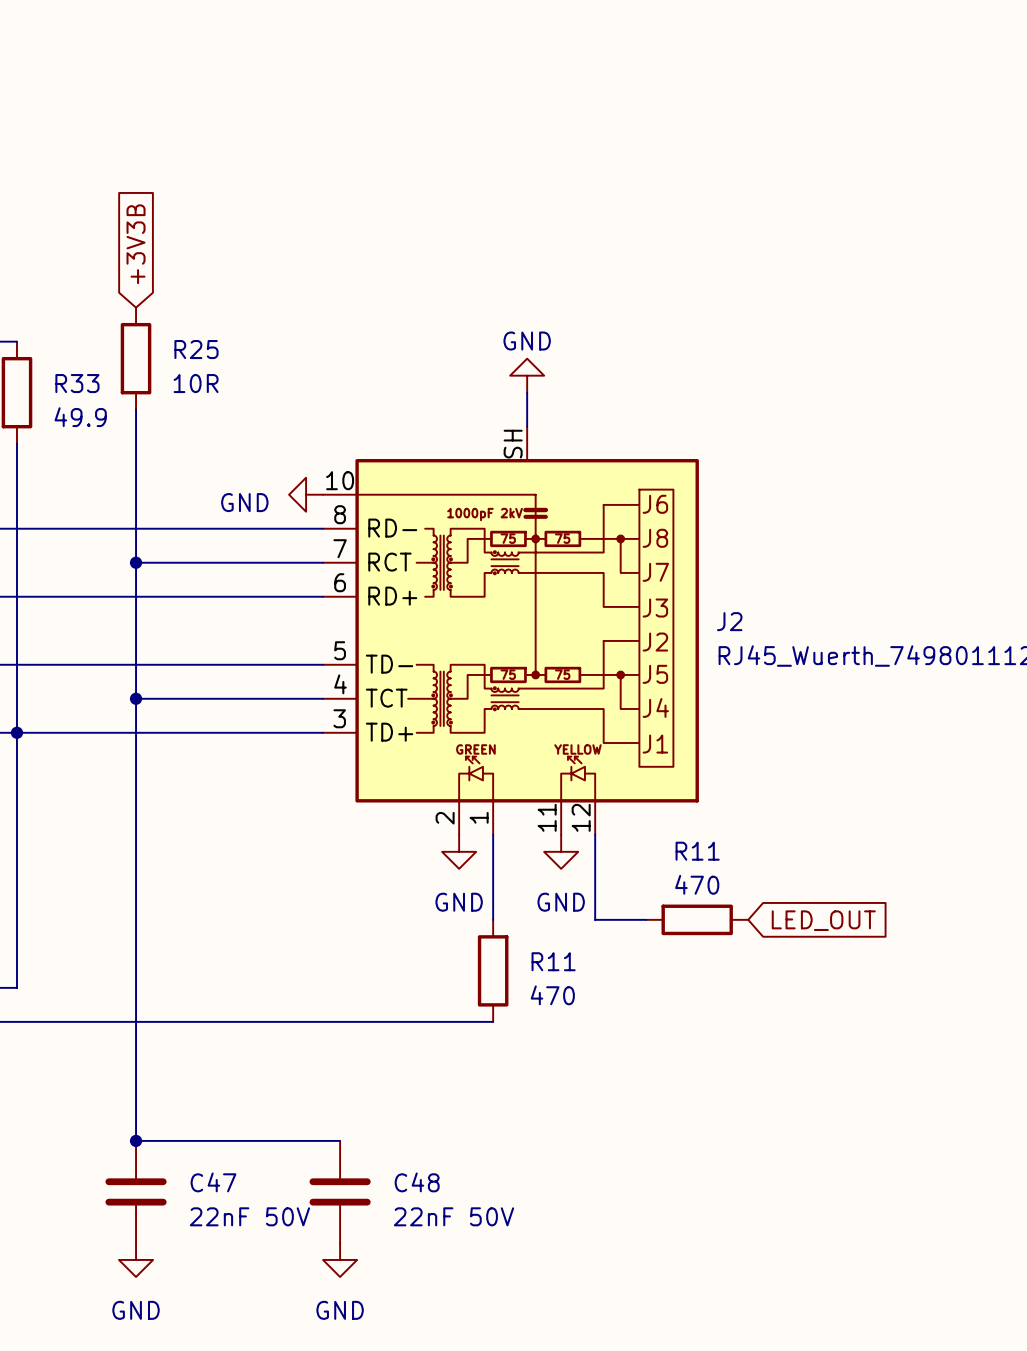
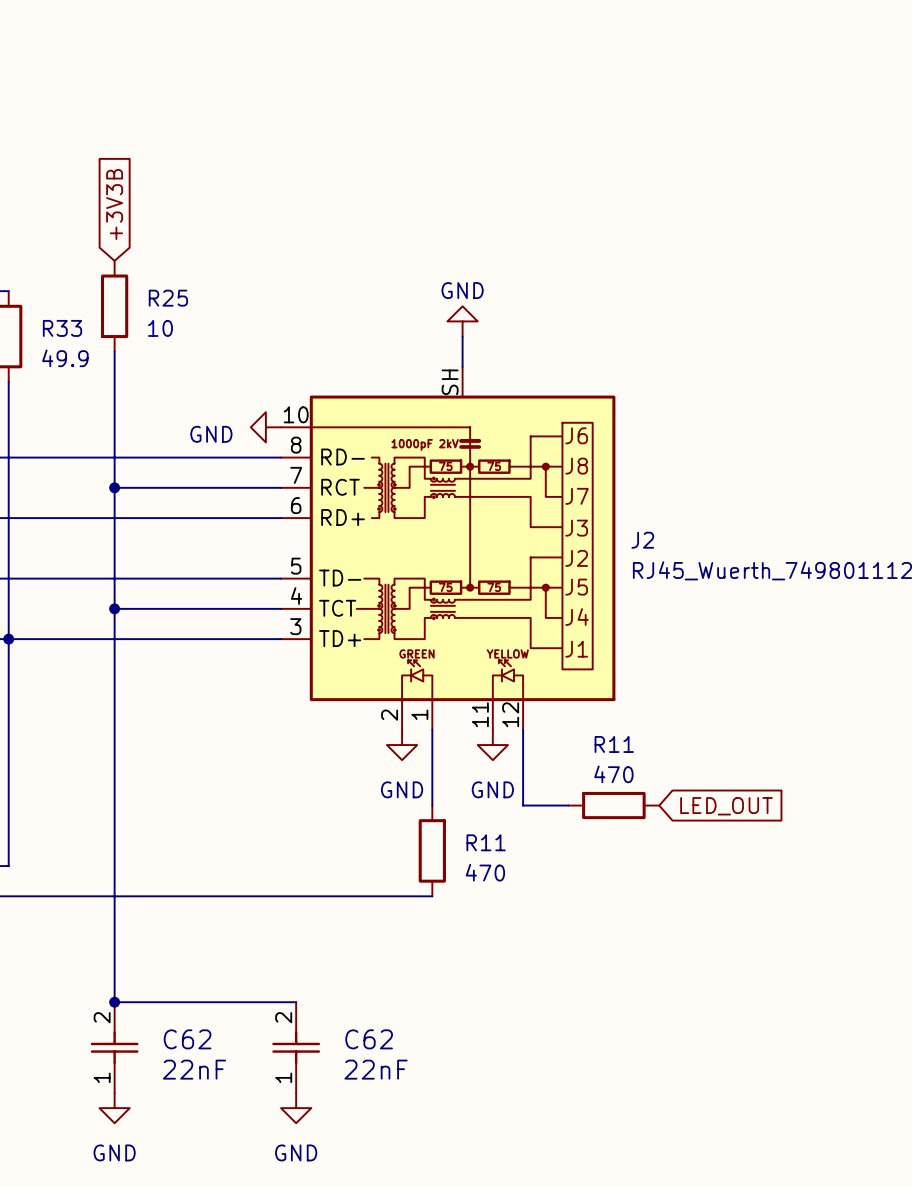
R25 value: 10R (196, 383) -> 10 (160, 328)
C47: 22nF 50V (136, 1191) -> none
C62: none -> 22nF (114, 1047)
C48: 22nF 50V (340, 1191) -> none
C62: none -> 22nF (296, 1047)

